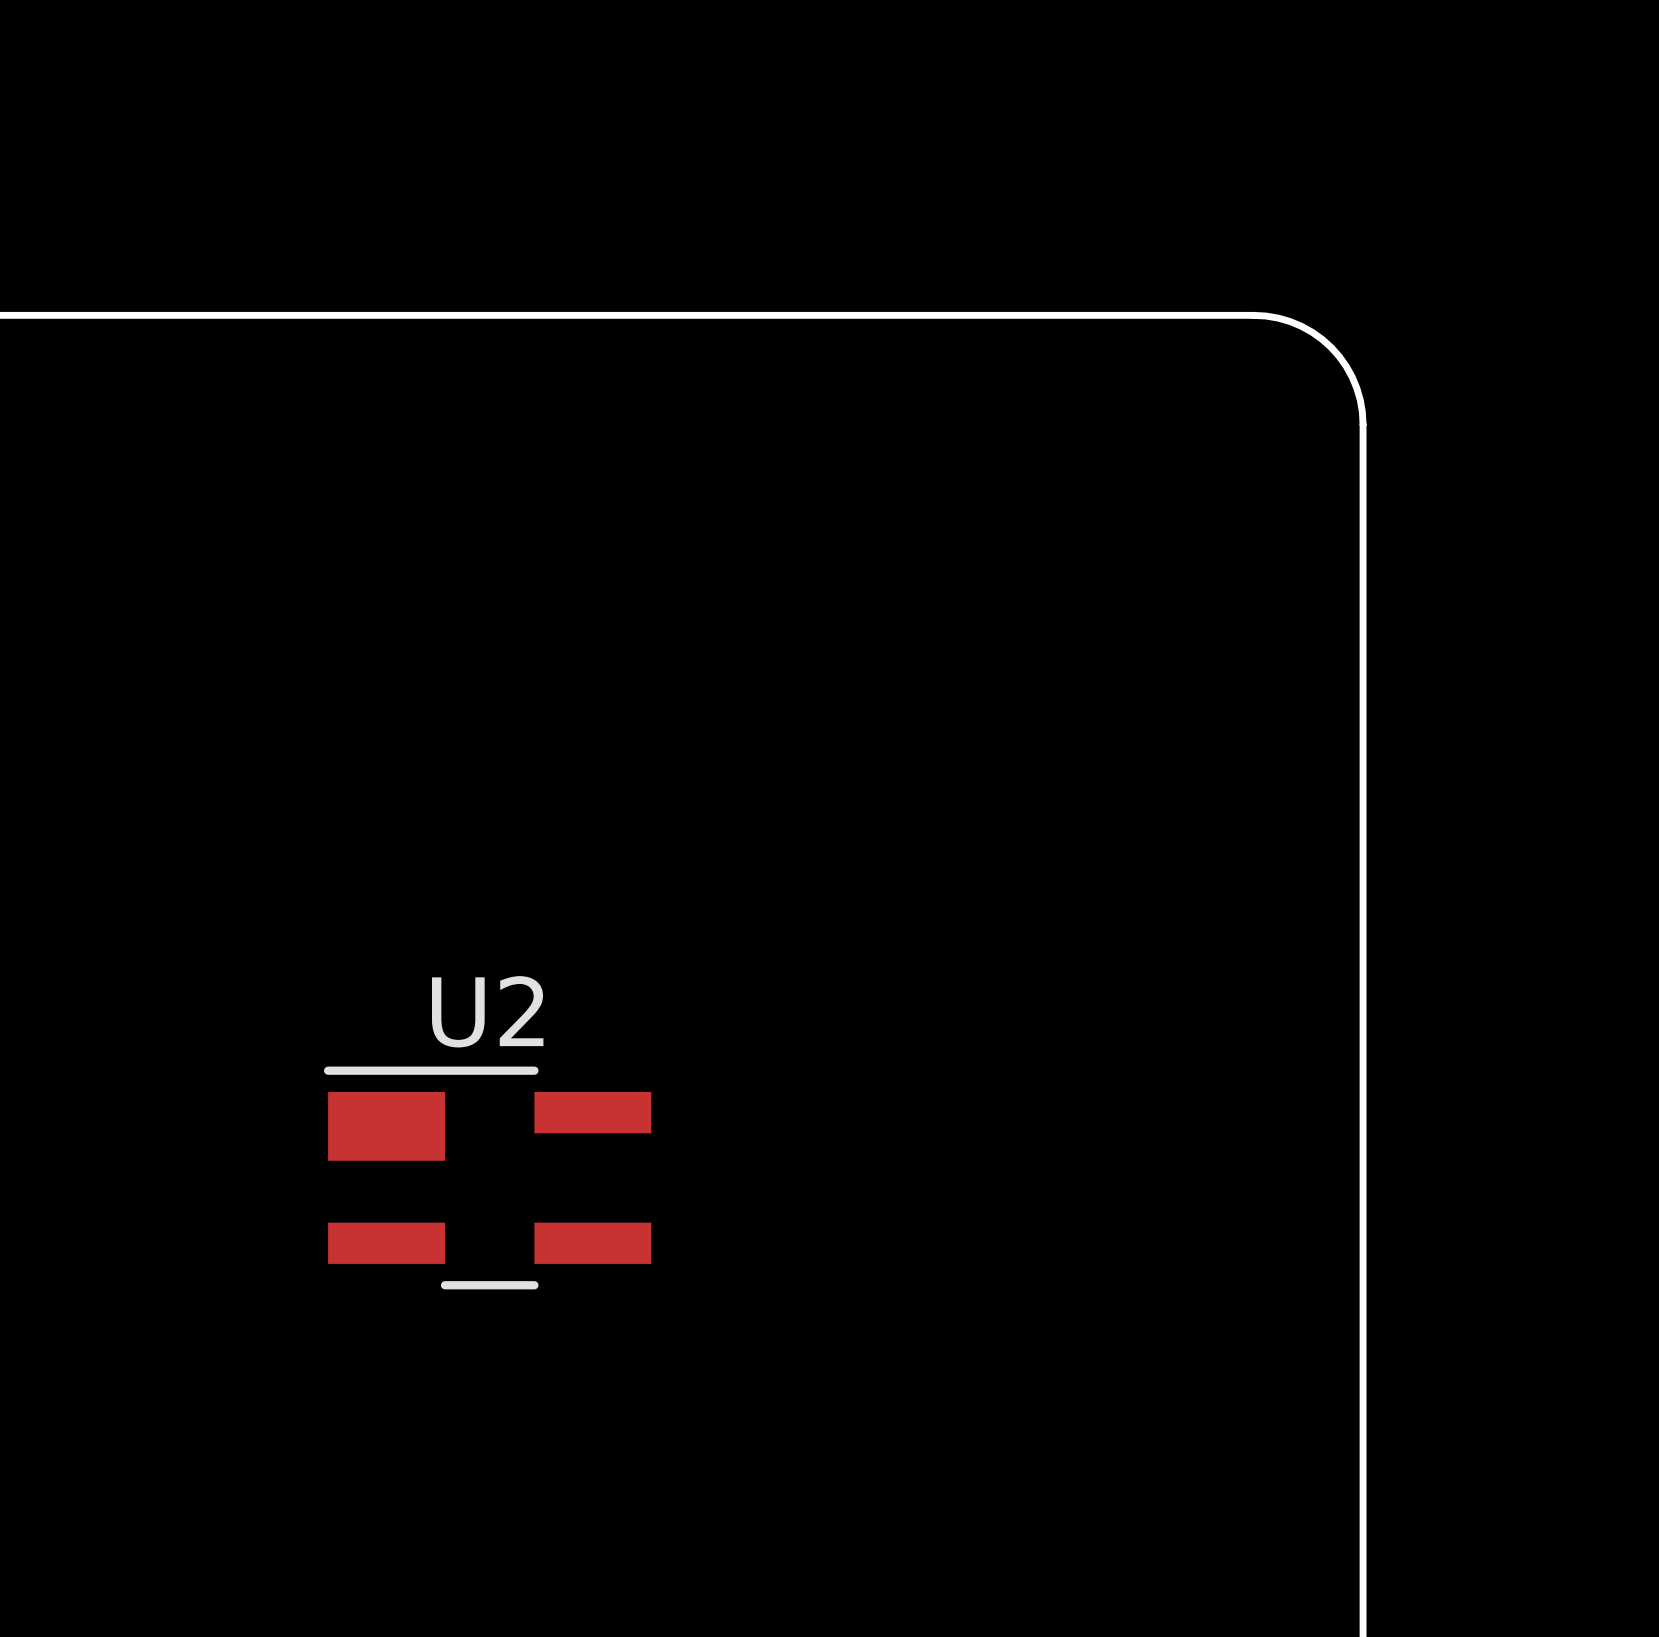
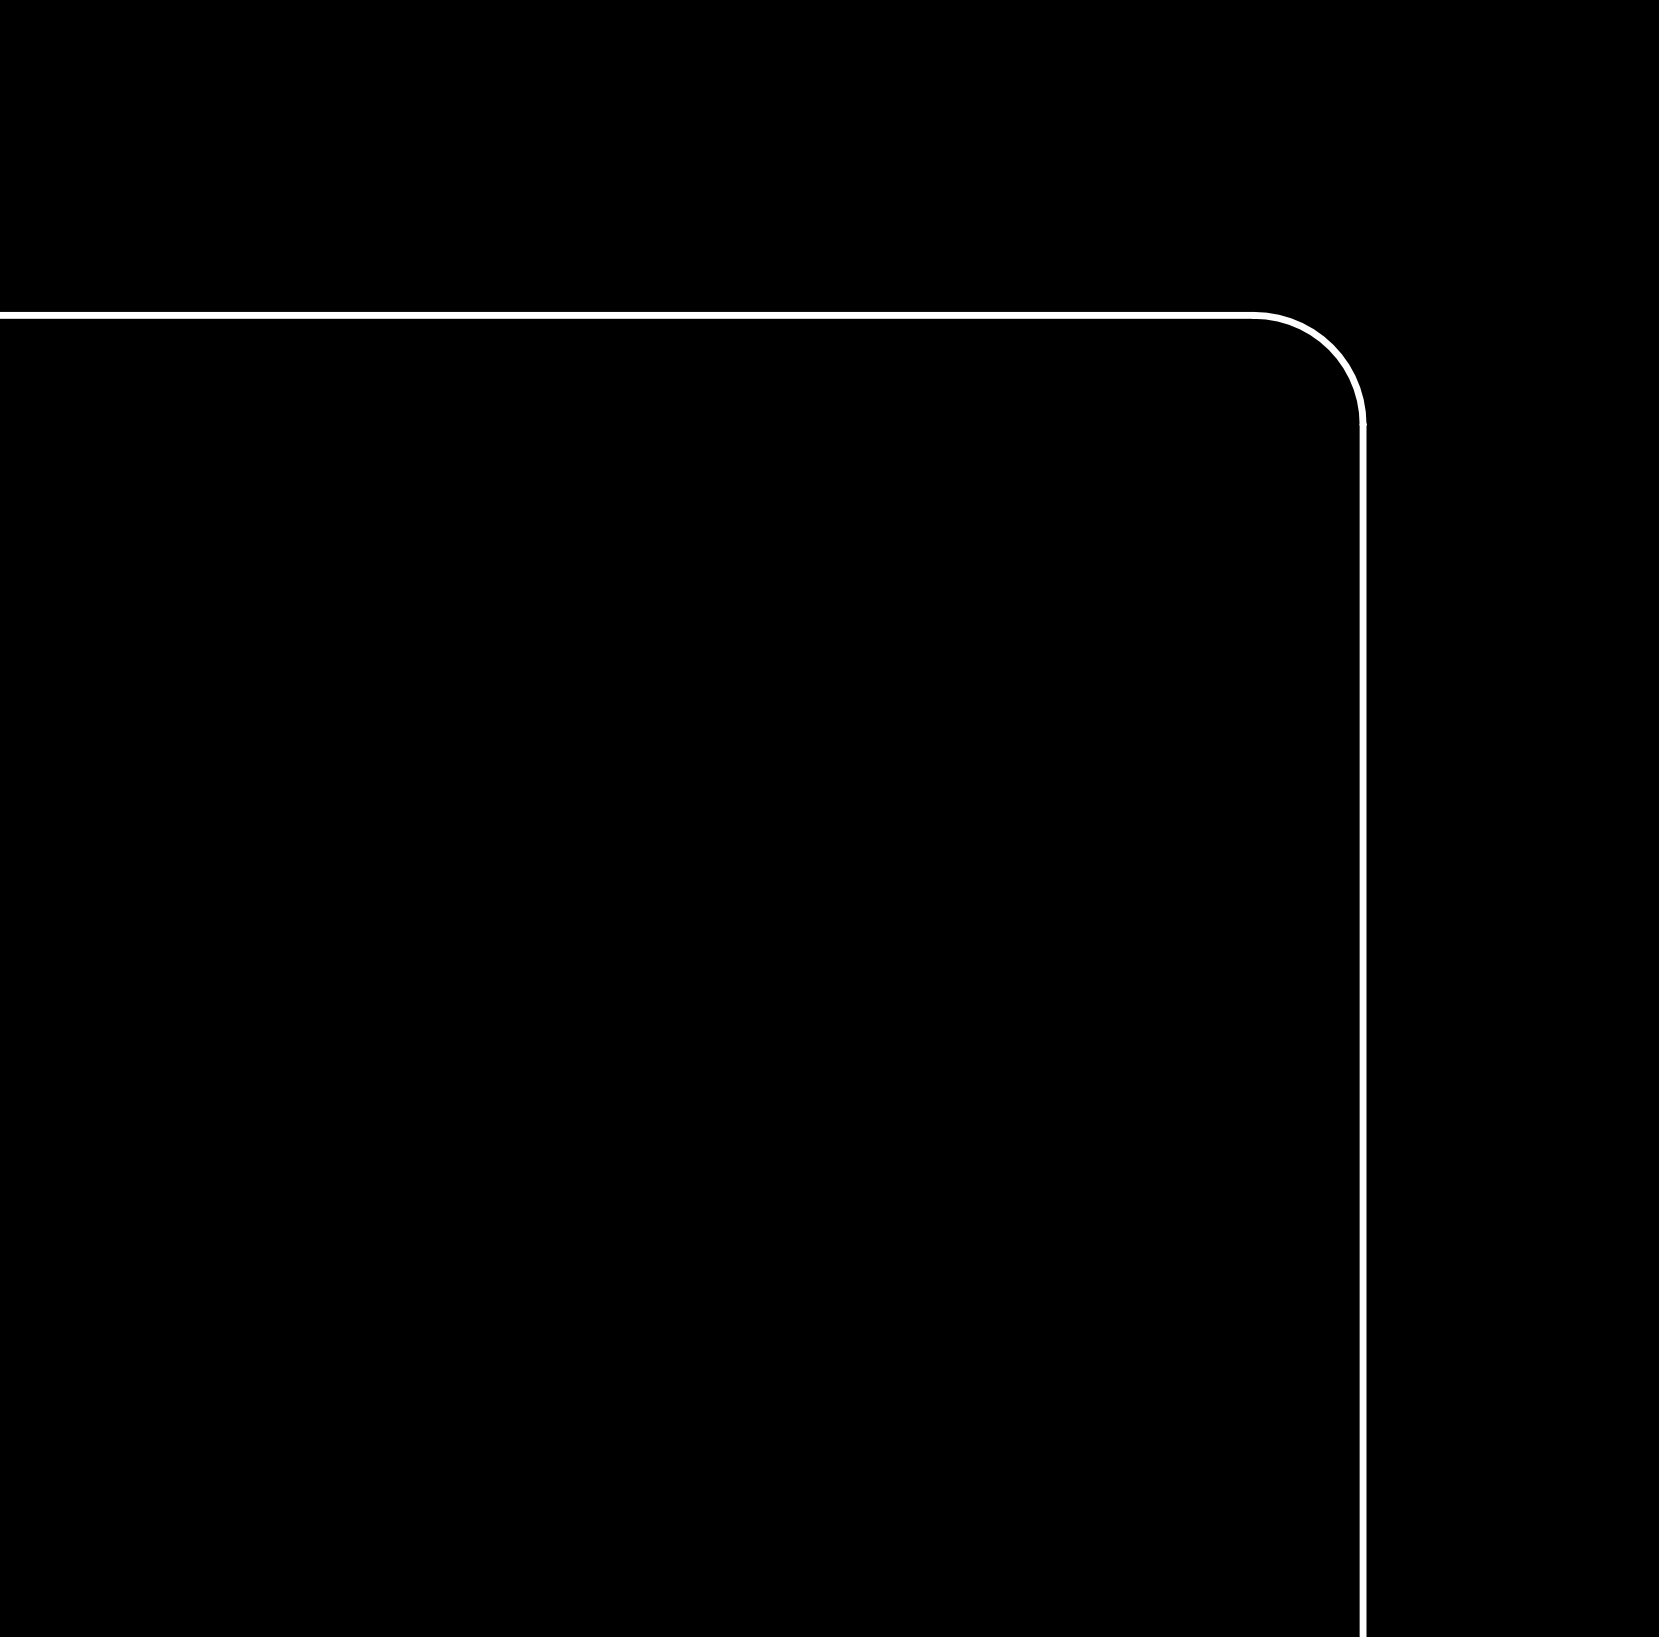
U2: (487, 1177) -> none

